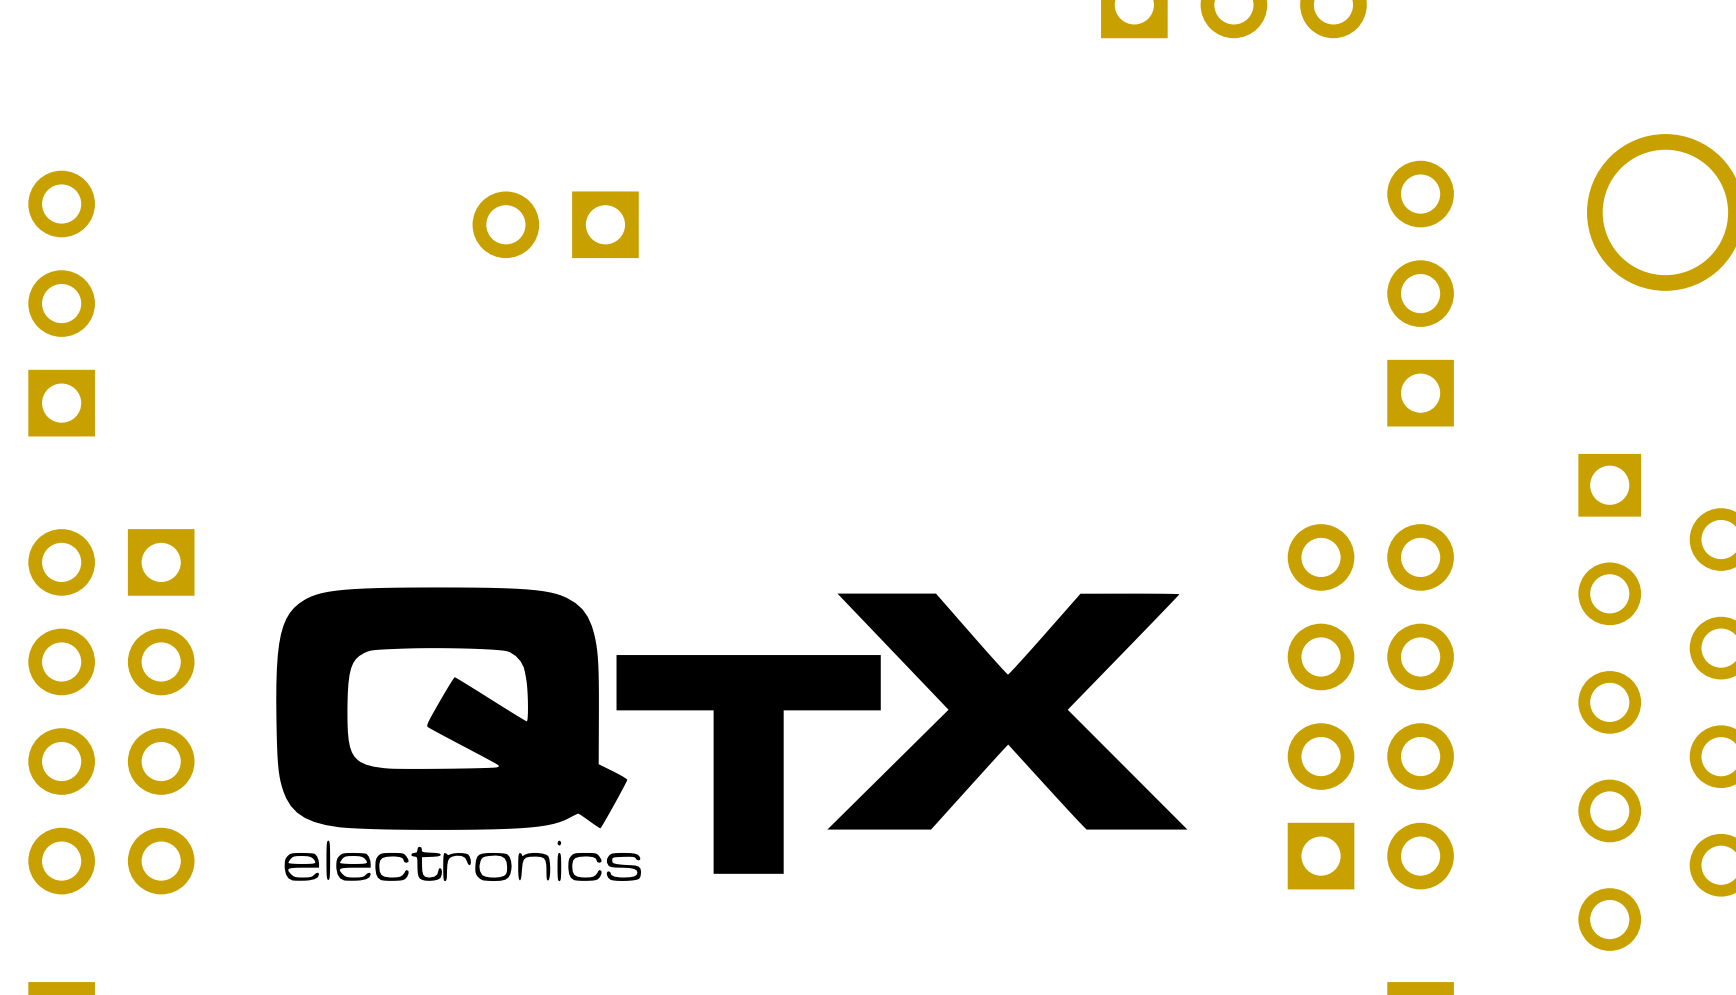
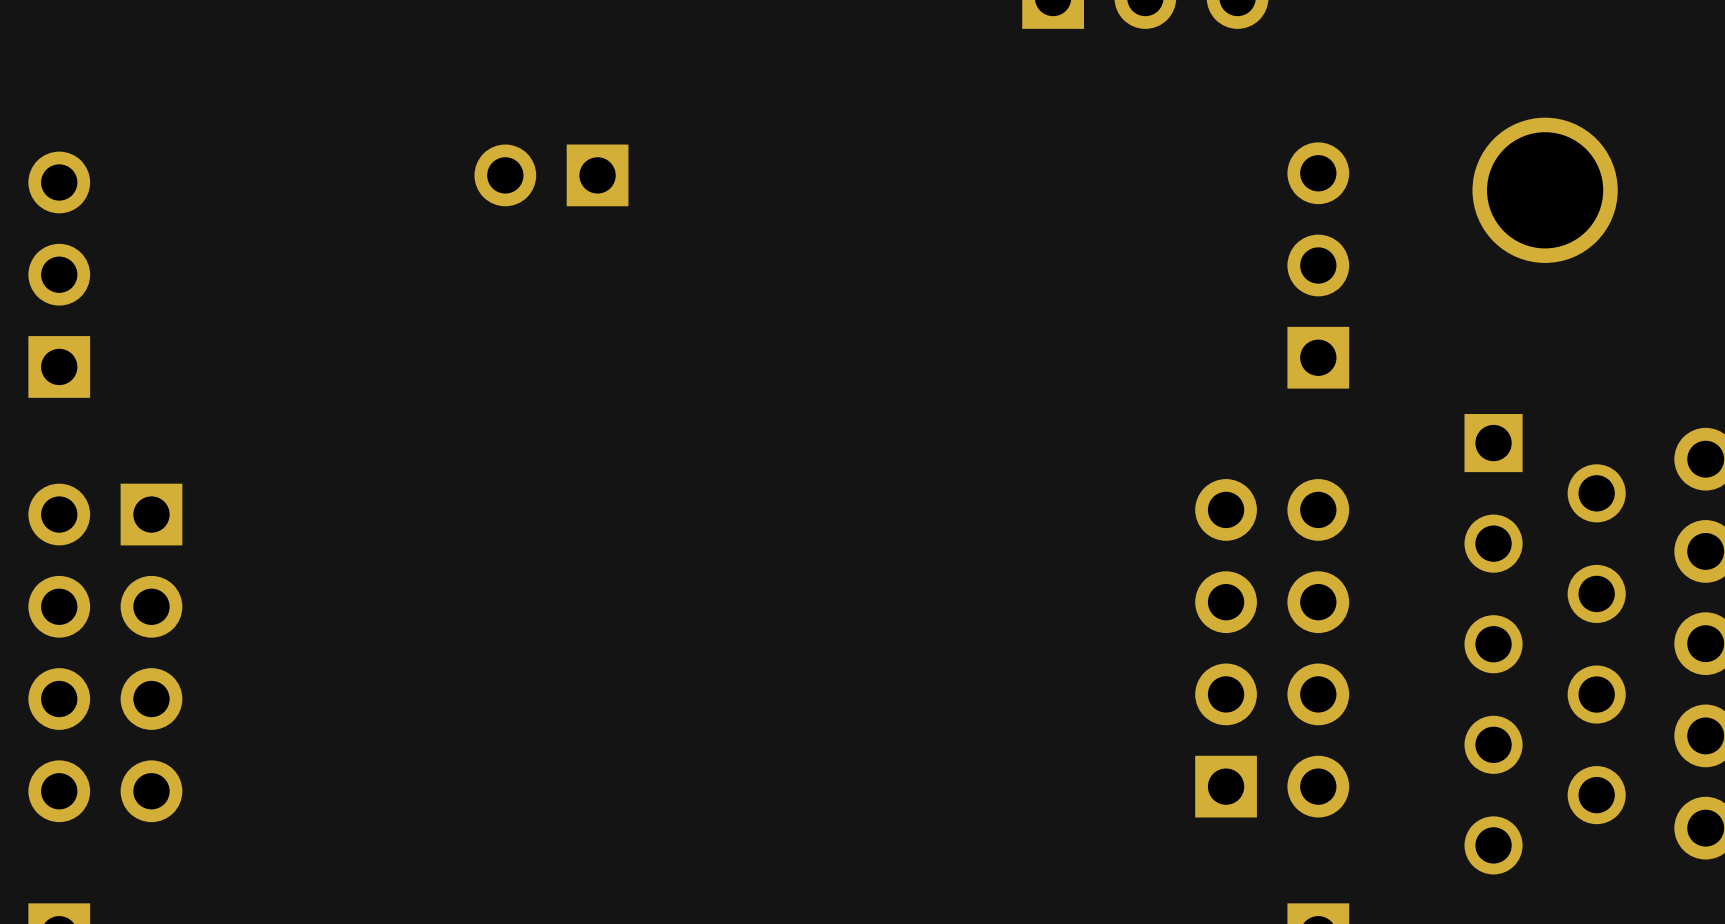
part position: (555, 224) -> (551, 175)
drawing: [276, 587, 1188, 882] -> none

